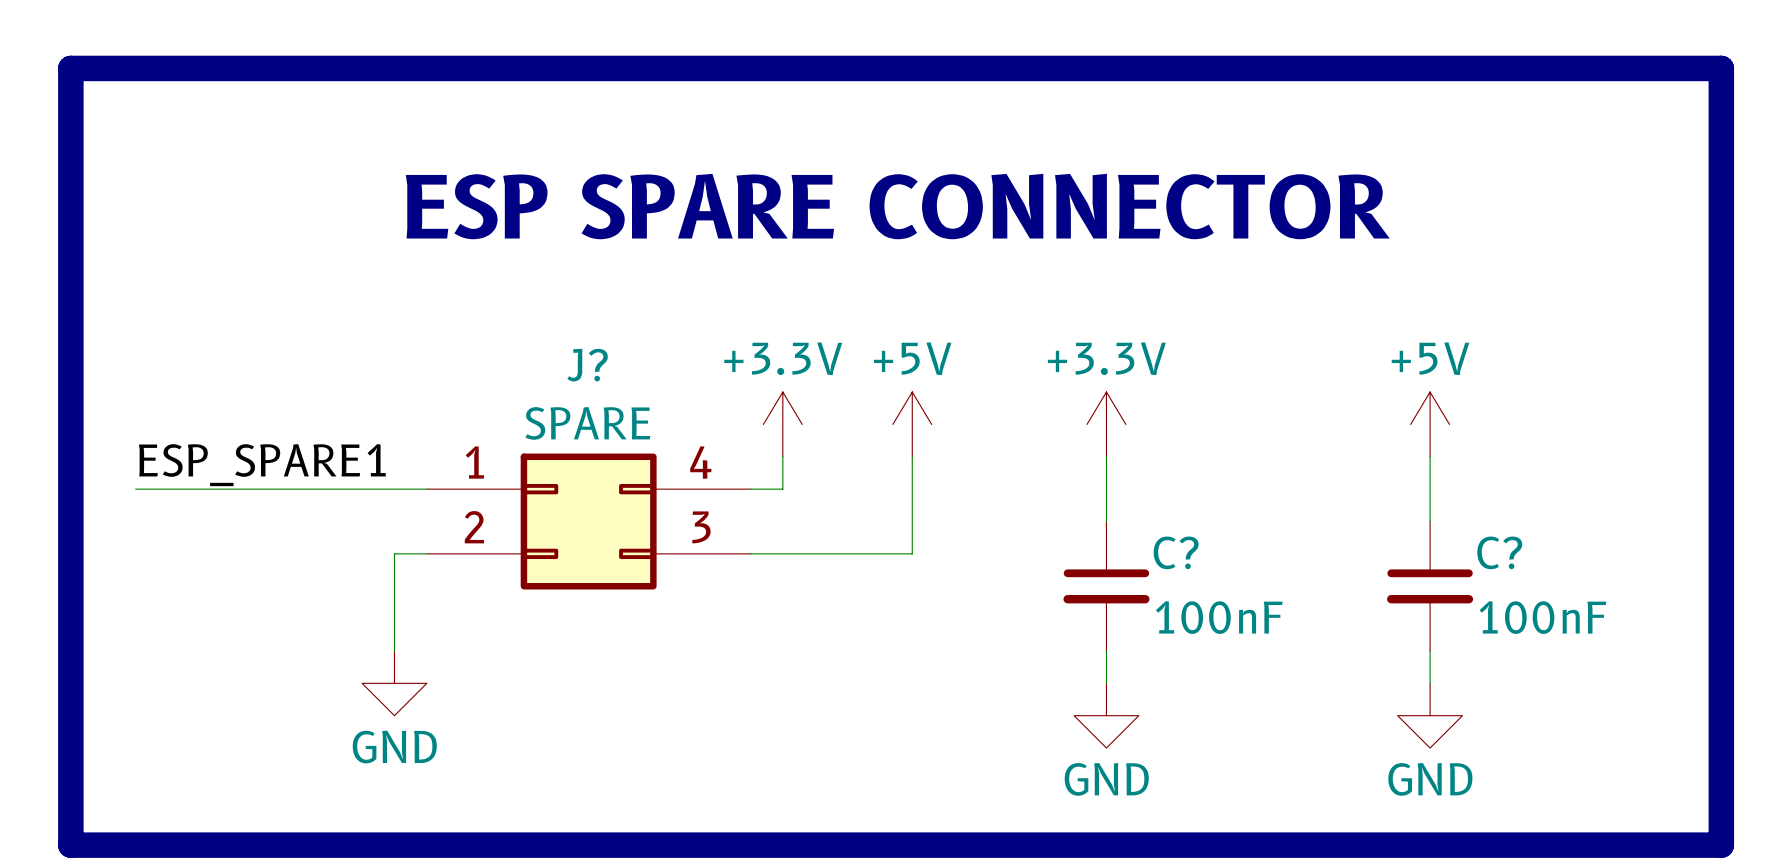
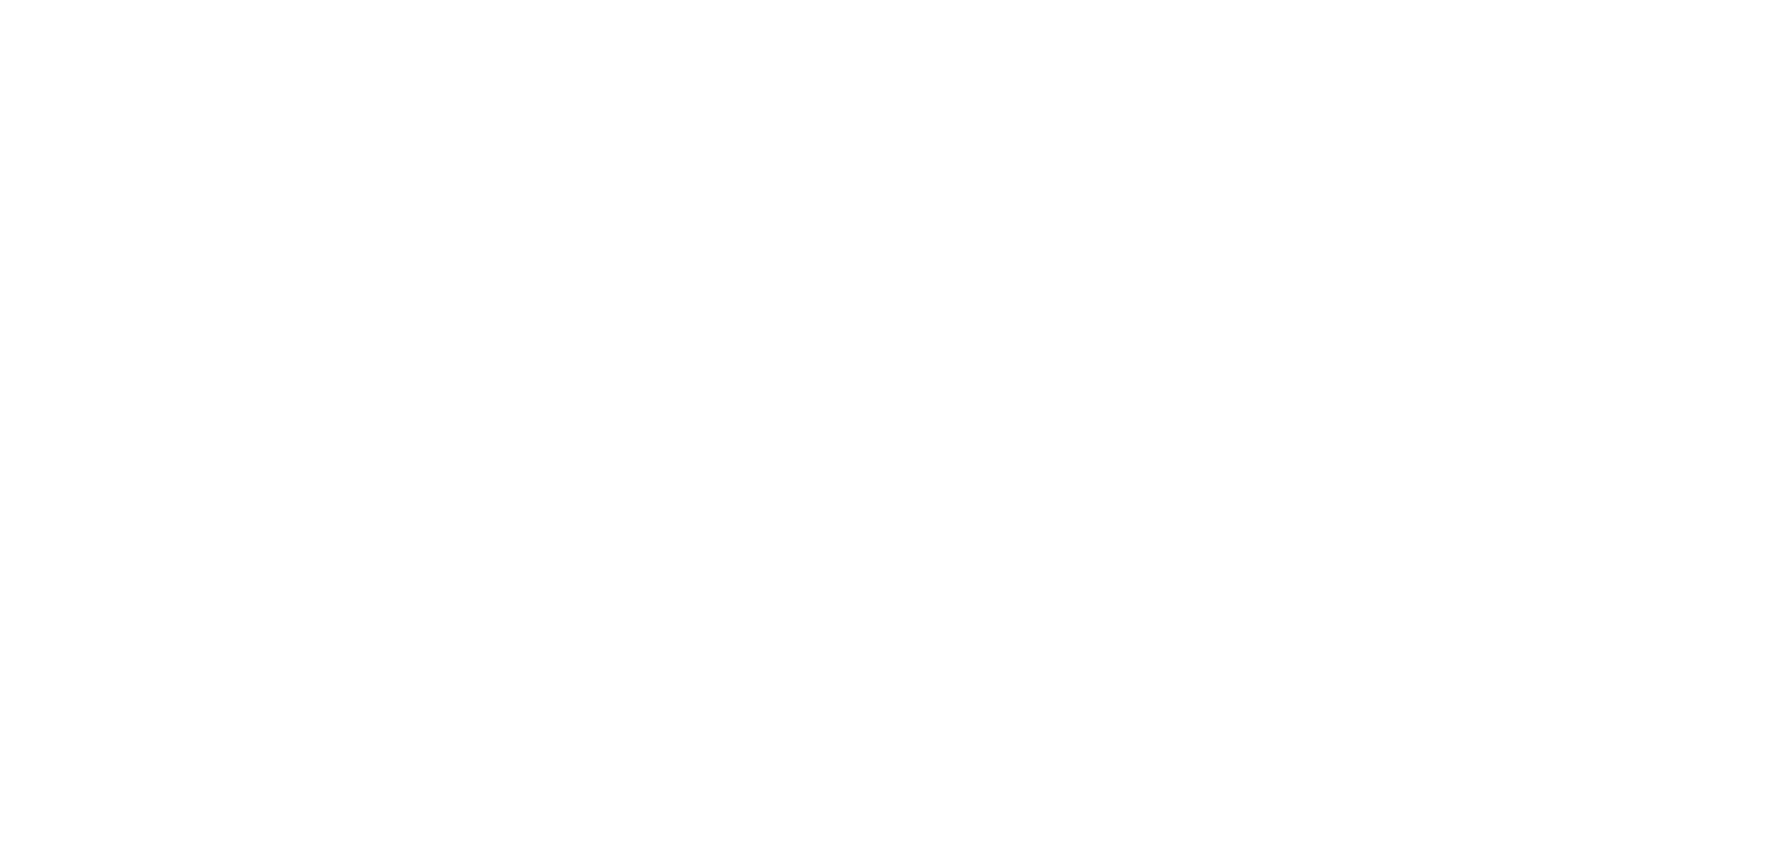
line: (70, 68) (70, 845) (1721, 845) (1721, 68) (70, 68) -> none
text: ESP SPARE CONNECTOR (897, 206) -> none
power symbol: +3.3V (782, 424) -> none
power symbol: +5V (912, 424) -> none
power symbol: +3.3V (1106, 424) -> none
power symbol: +5V (1430, 424) -> none
wire: (782, 456) (782, 489) (750, 489) -> none
wire: (912, 456) (912, 553) (750, 553) -> none
wire: (1106, 456) (1106, 521) -> none
wire: (1430, 456) (1430, 521) -> none
label: ESP_SPARE1 (262, 465) -> none
wire: (135, 489) (426, 489) -> none
J?: (588, 521) -> none
wire: (426, 553) (394, 553) (394, 650) -> none
C?: 100nF (1106, 586) -> none
C?: 100nF (1430, 586) -> none
wire: (1106, 650) (1106, 683) -> none
wire: (1430, 650) (1430, 683) -> none
power symbol: GND (394, 683) -> none
power symbol: GND (1106, 715) -> none
power symbol: GND (1430, 715) -> none

